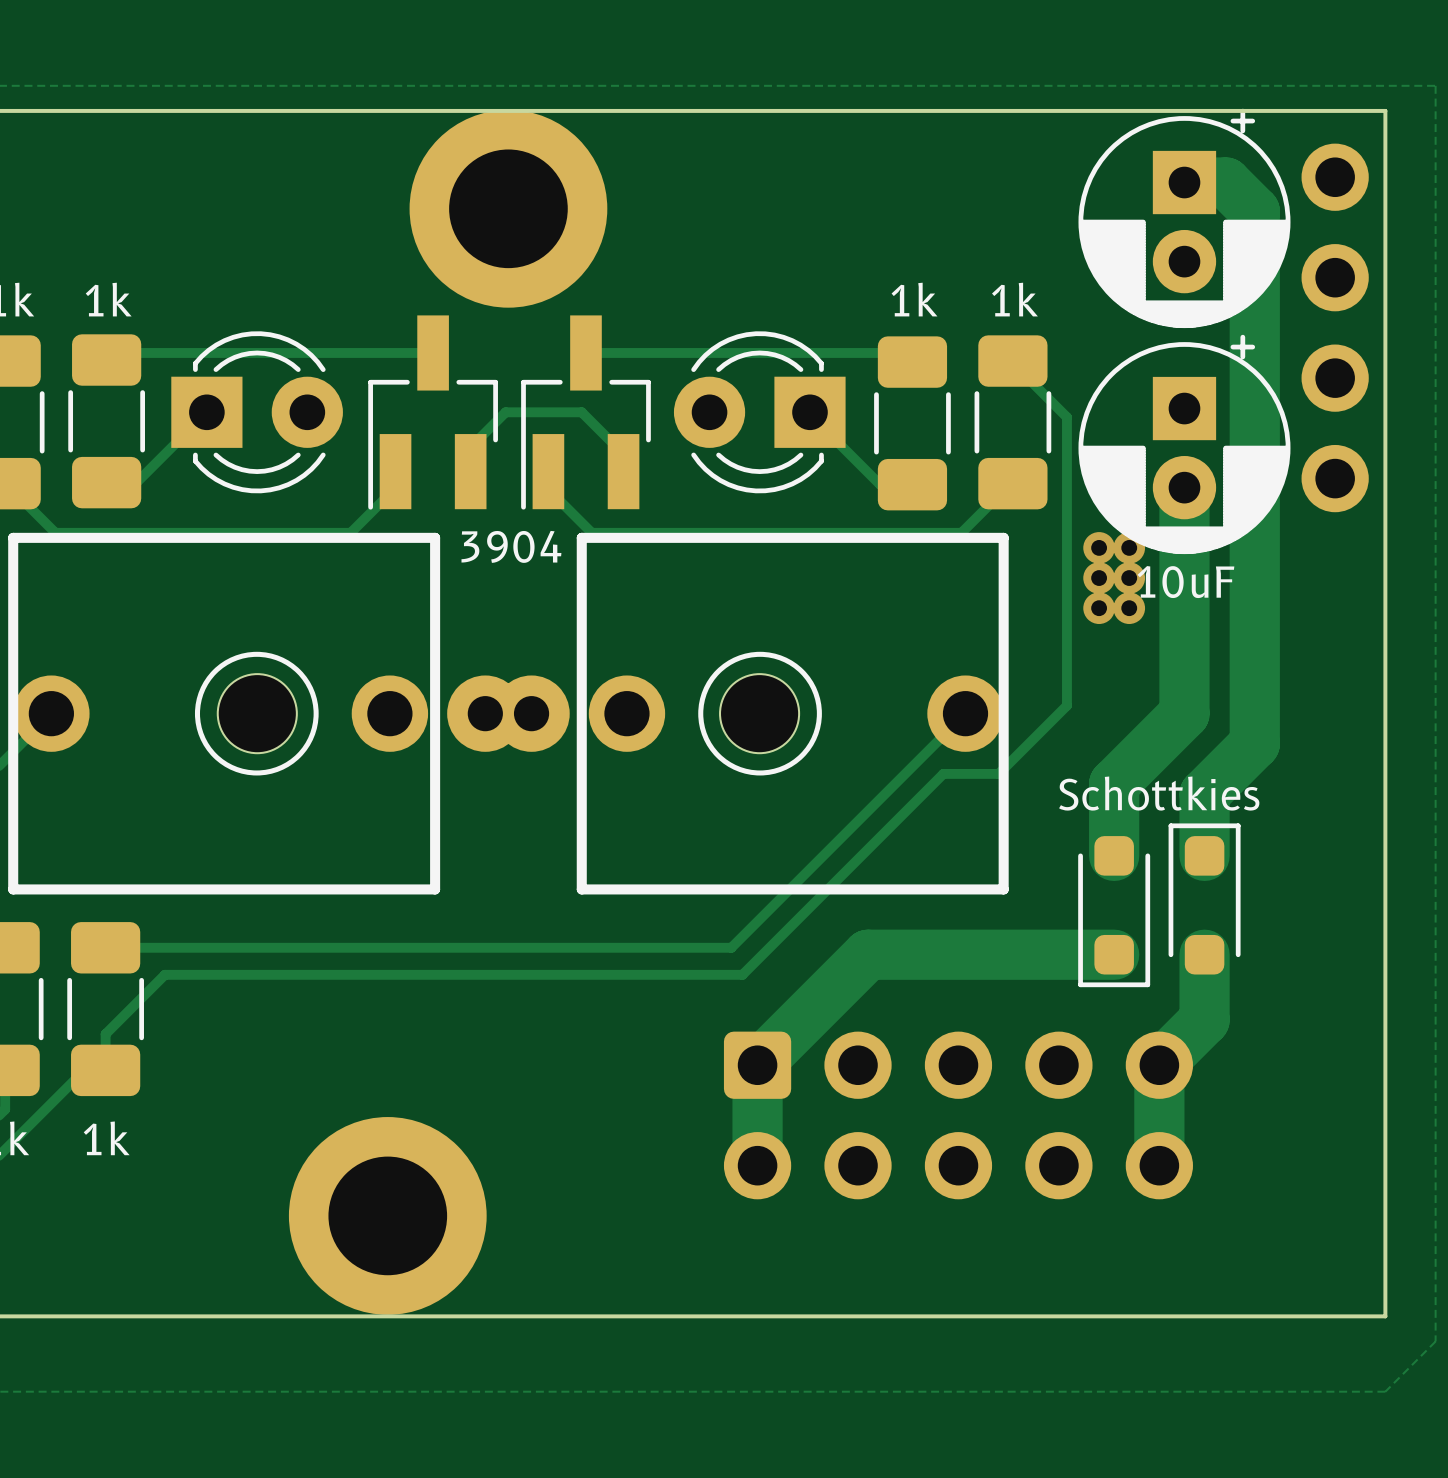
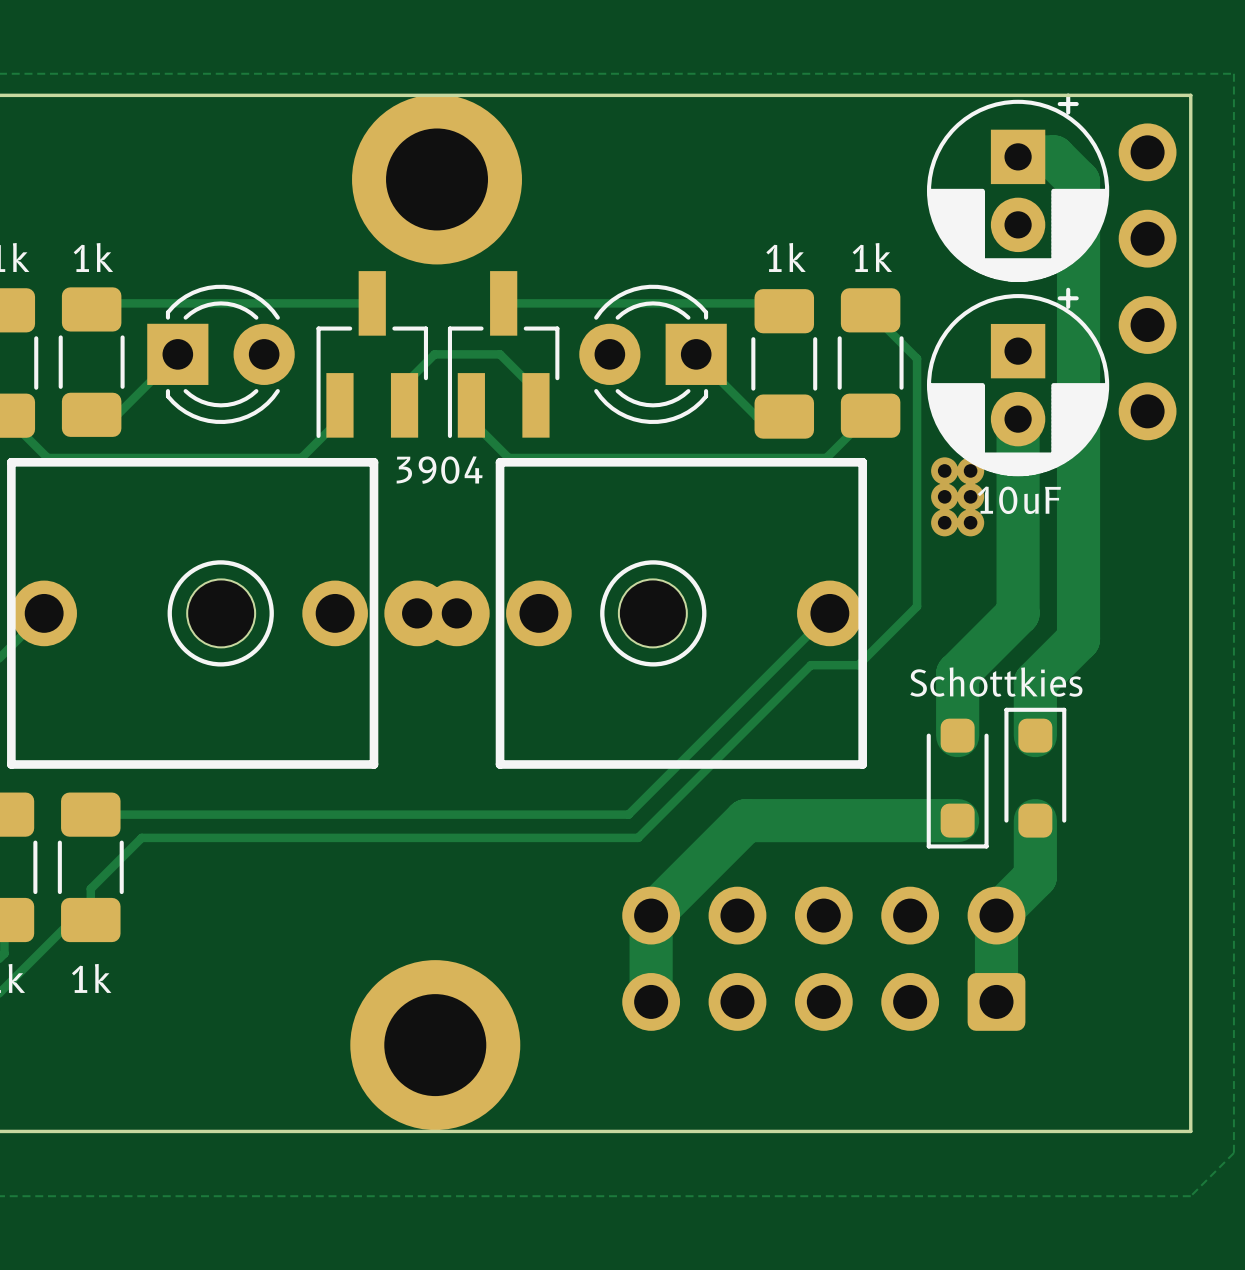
part rotation: 0° (958, 1115) -> 180° (823, 958)
part position: (387, 1215) -> (435, 1045)

